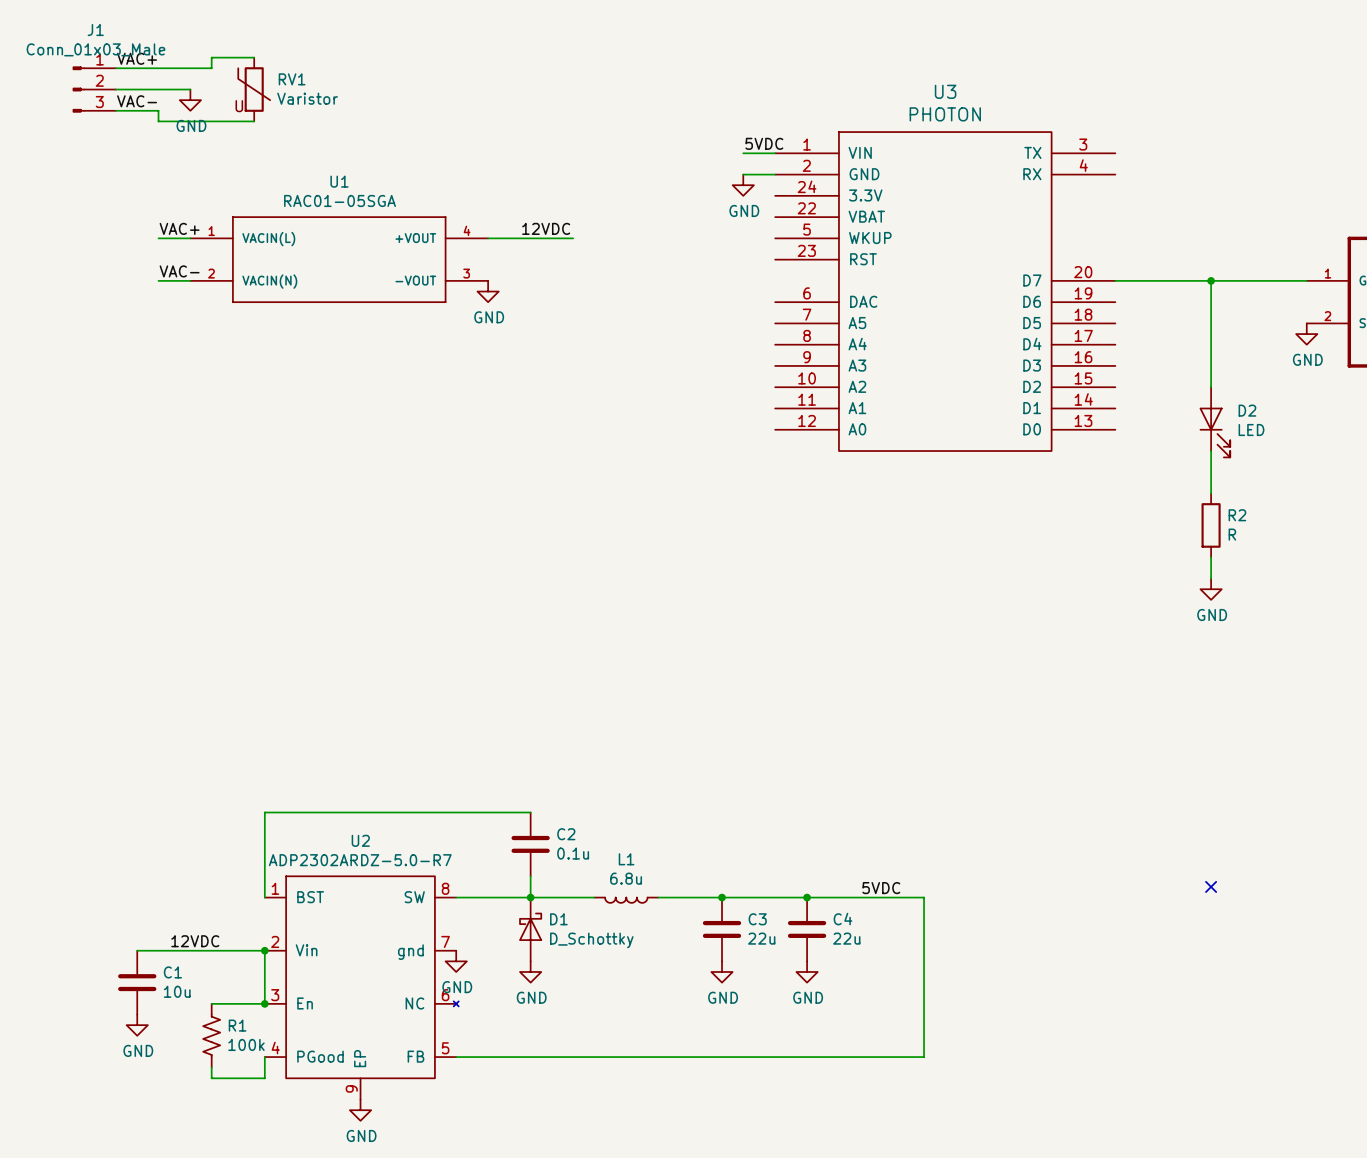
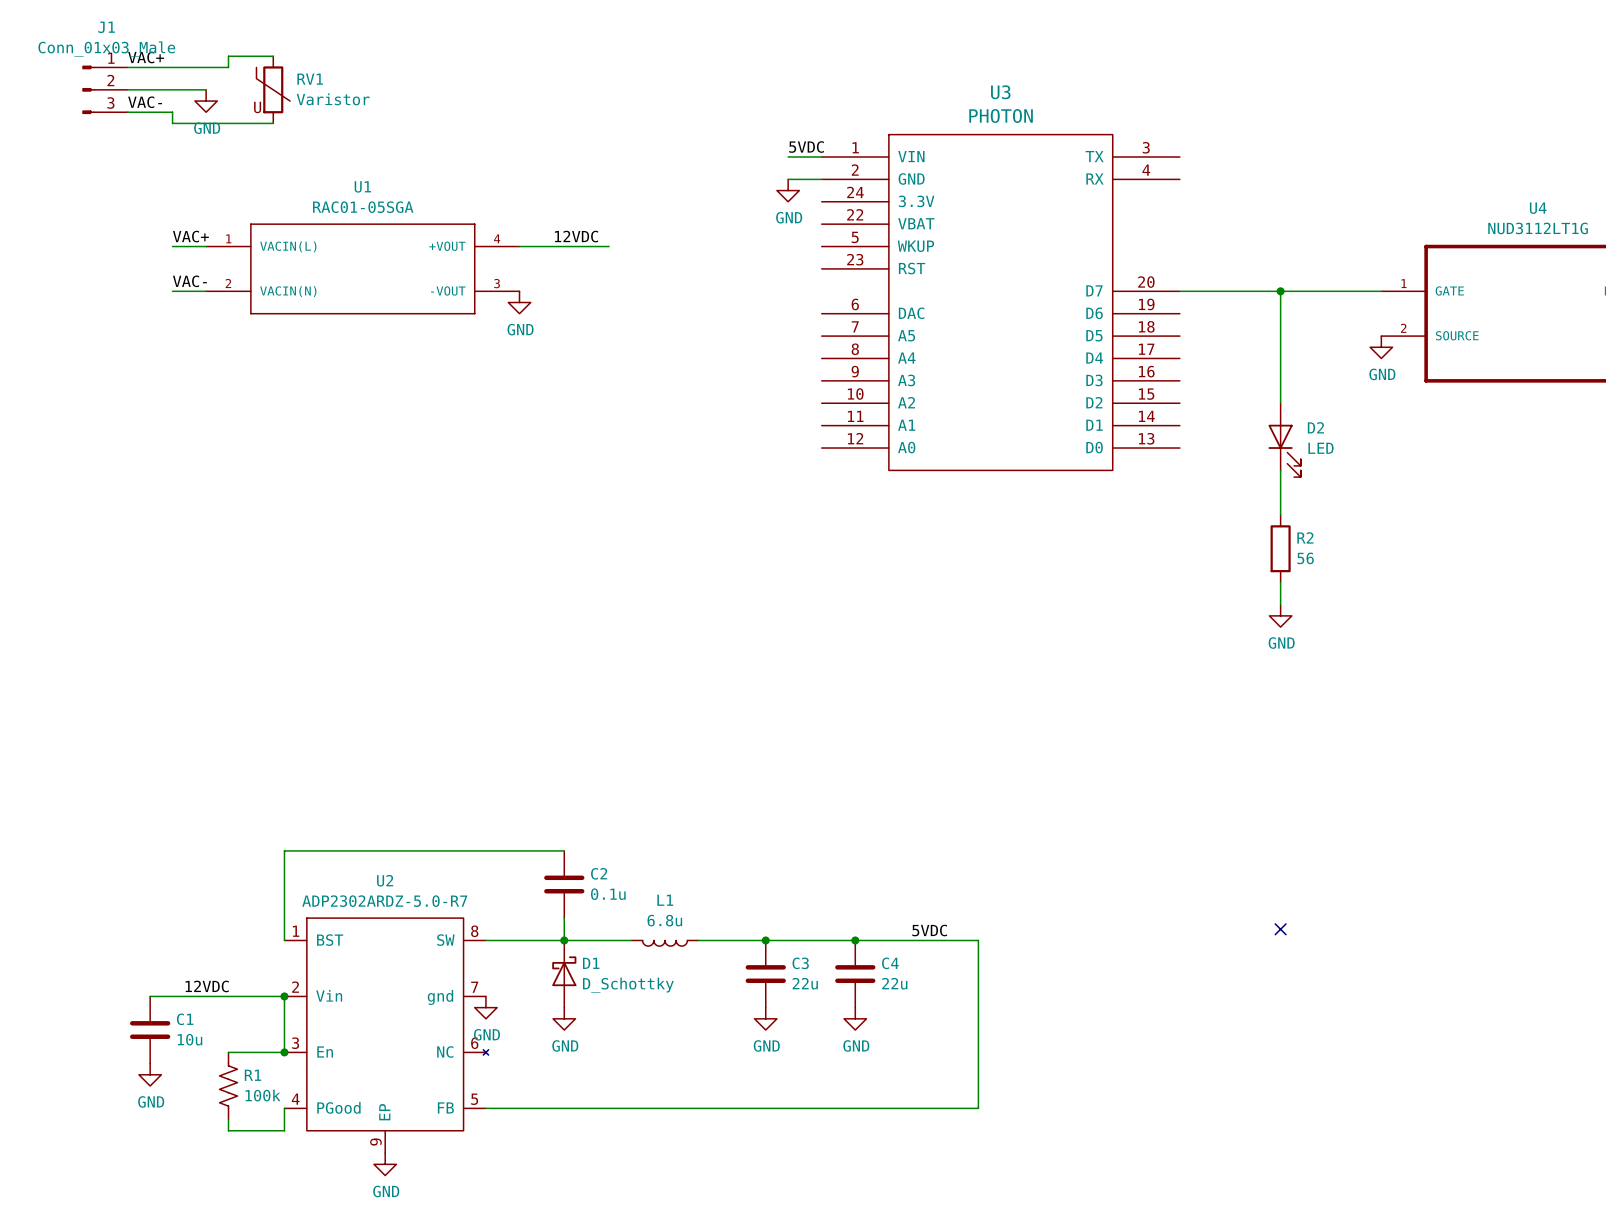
R2 value: R (1232, 534) -> 56 (1305, 558)

